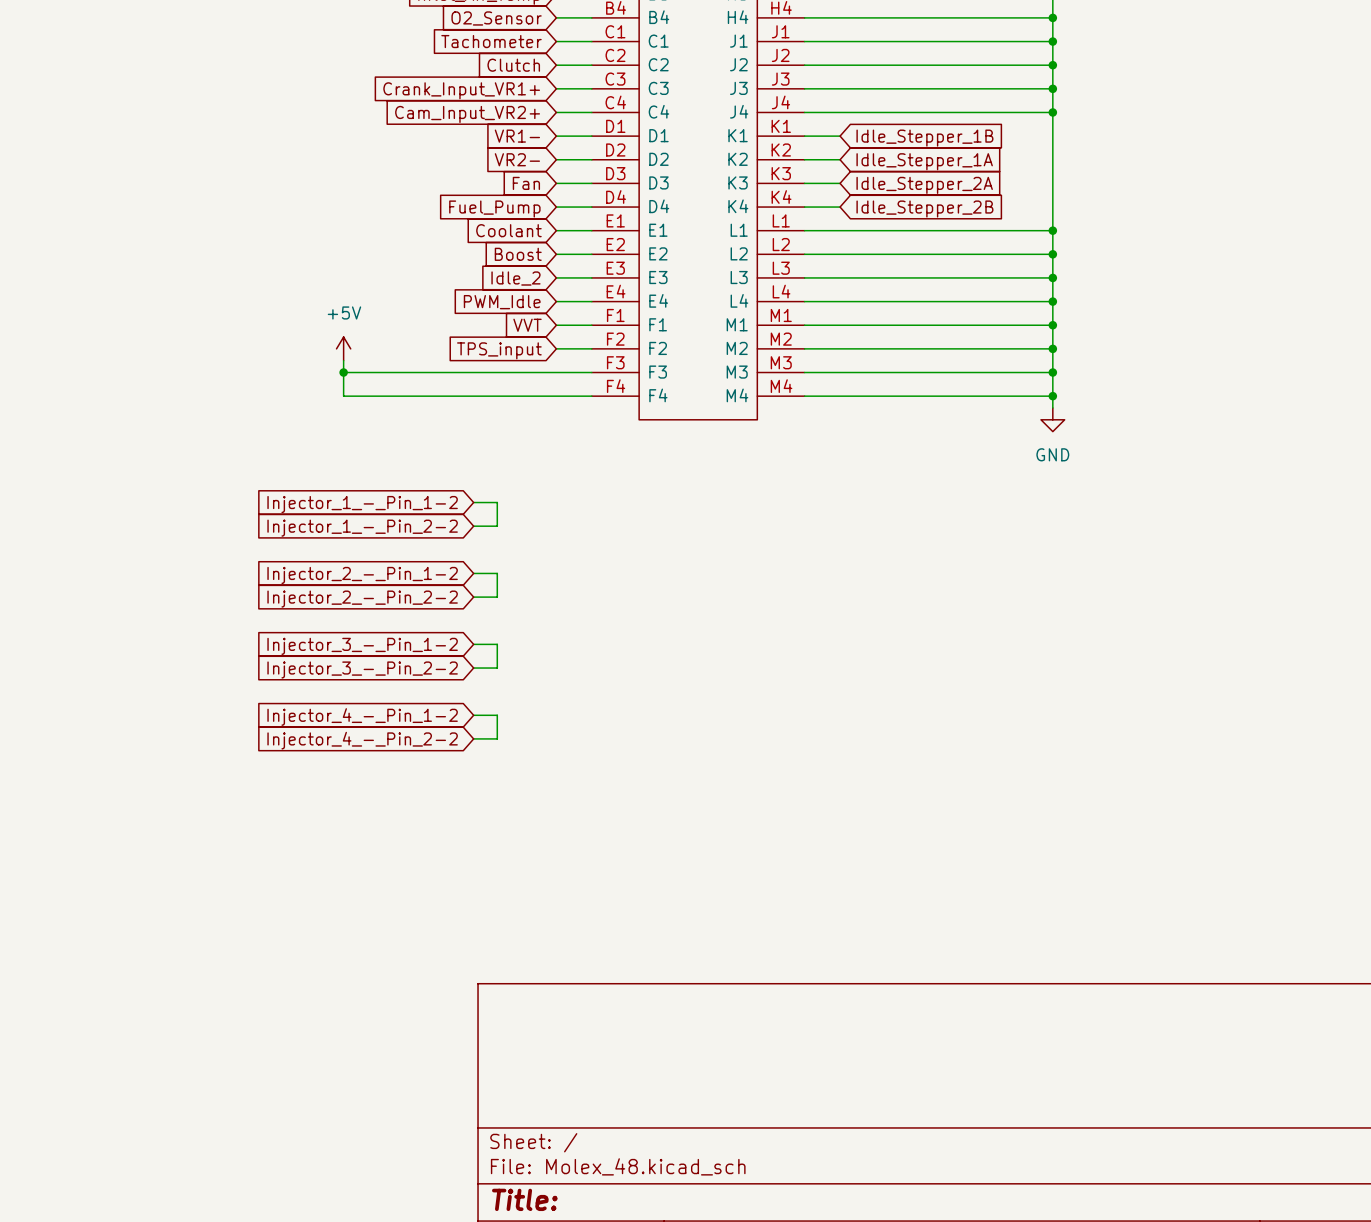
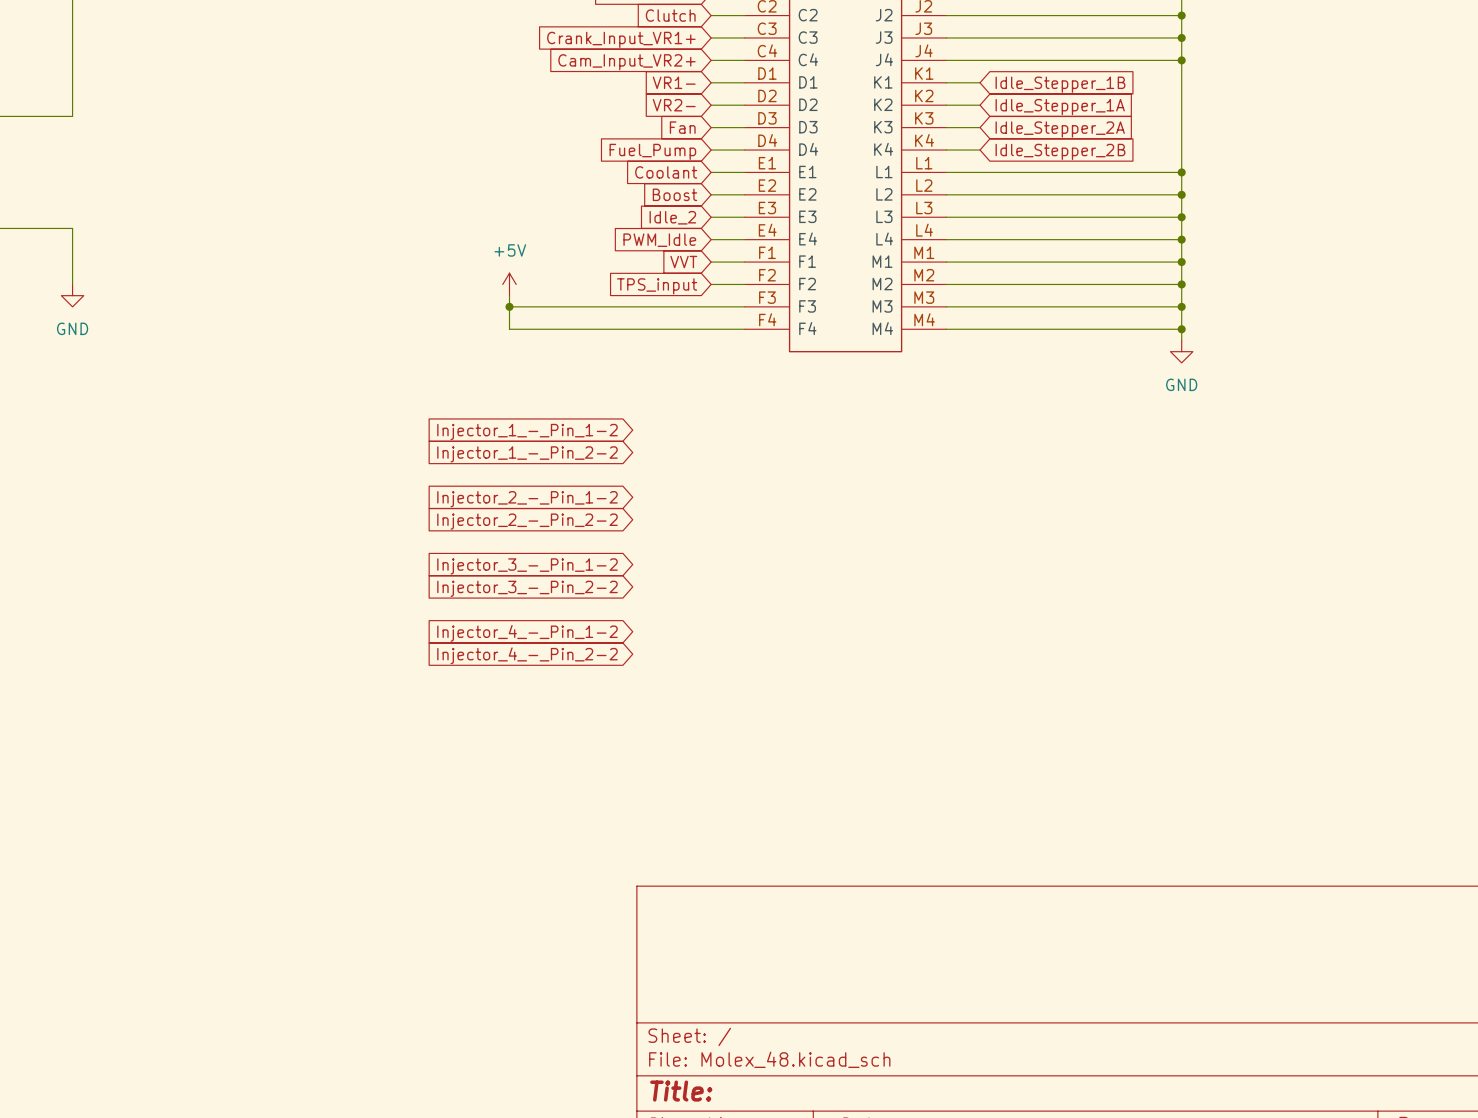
wire: (473, 502) (497, 502) (497, 526) (473, 526) -> none
wire: (473, 573) (497, 573) (497, 597) (473, 597) -> none
wire: (473, 644) (497, 644) (497, 668) (473, 668) -> none
wire: (473, 715) (497, 715) (497, 738) (473, 738) -> none

